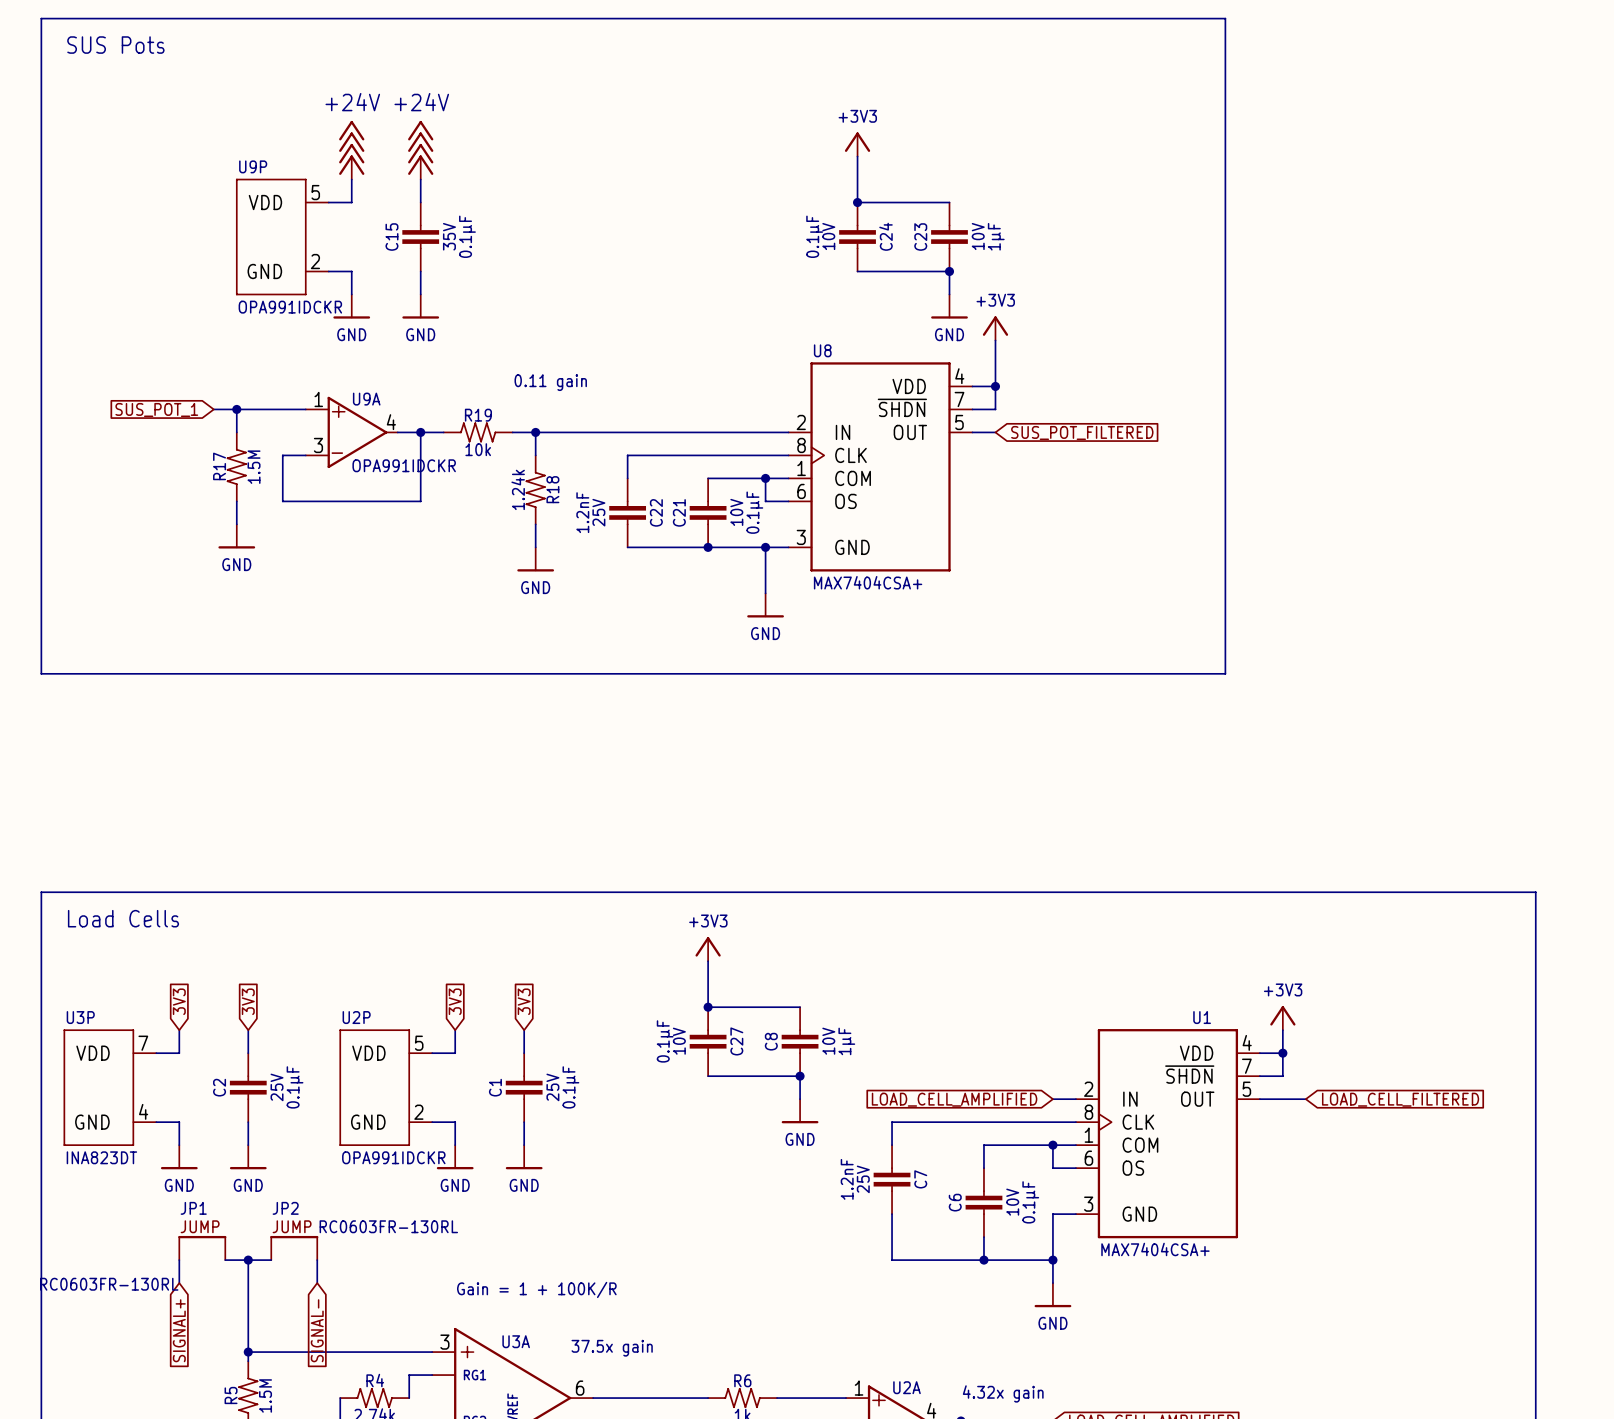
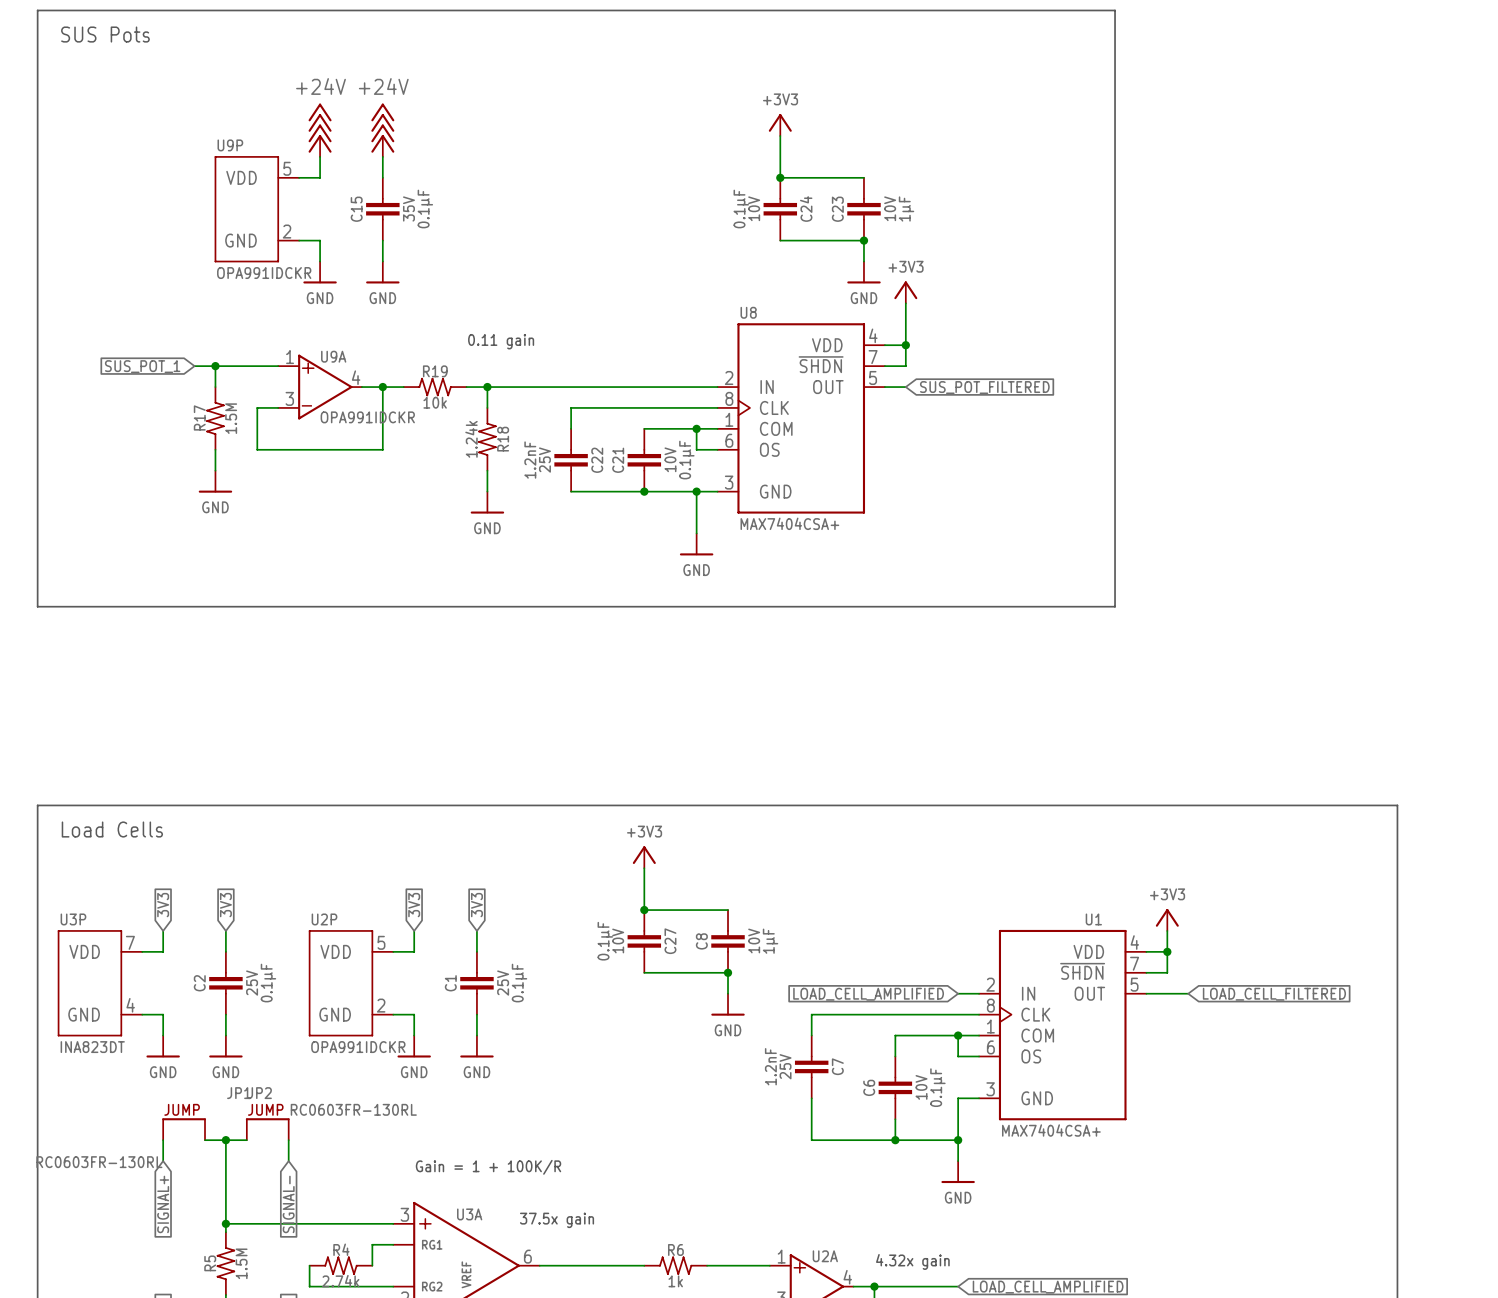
JP1 name position: JP1 (193, 1208) -> JP1 (239, 1093)

